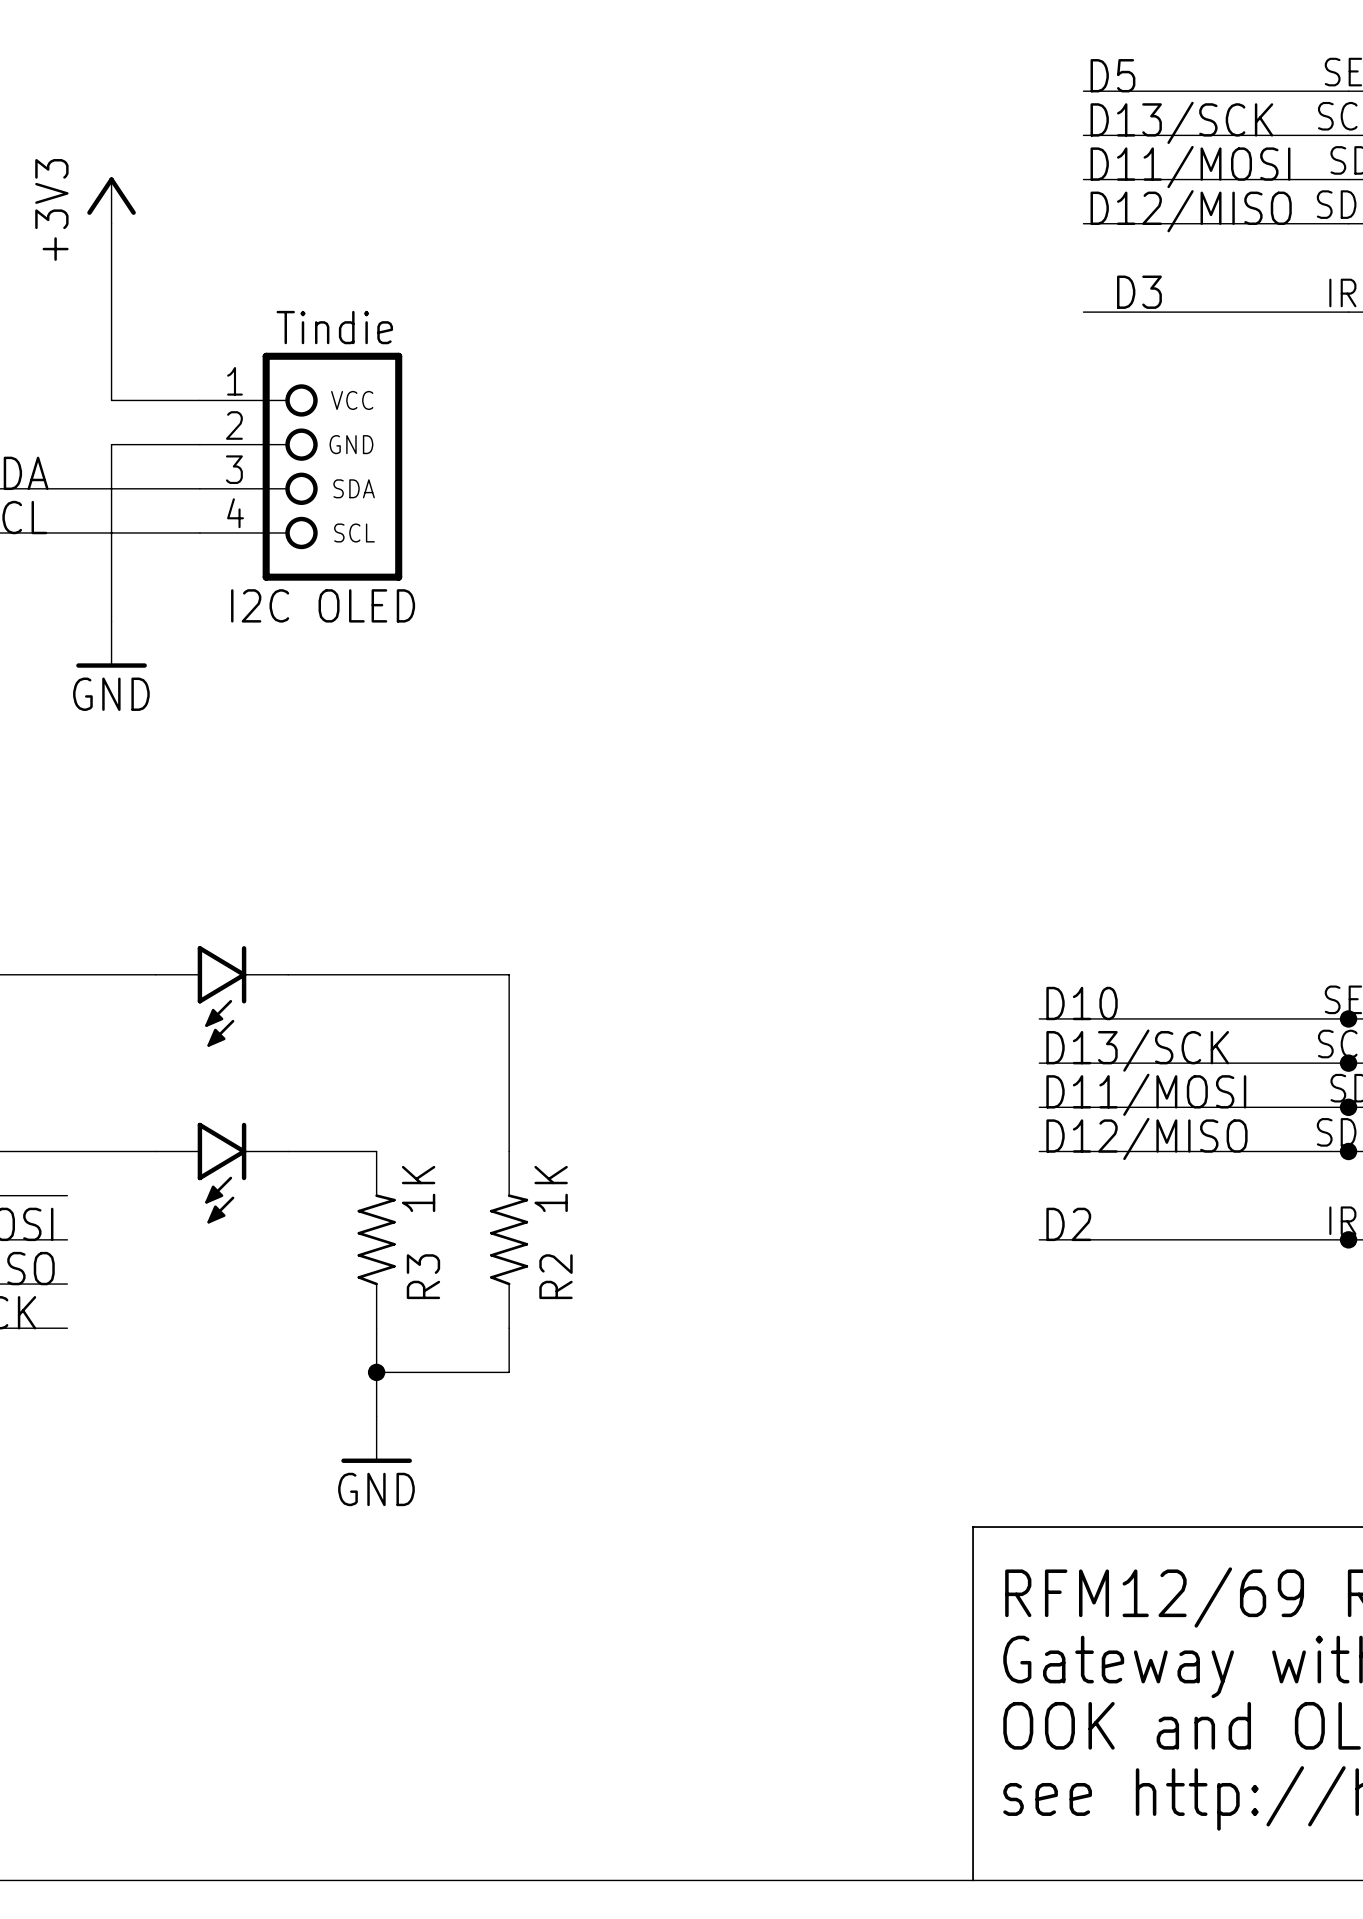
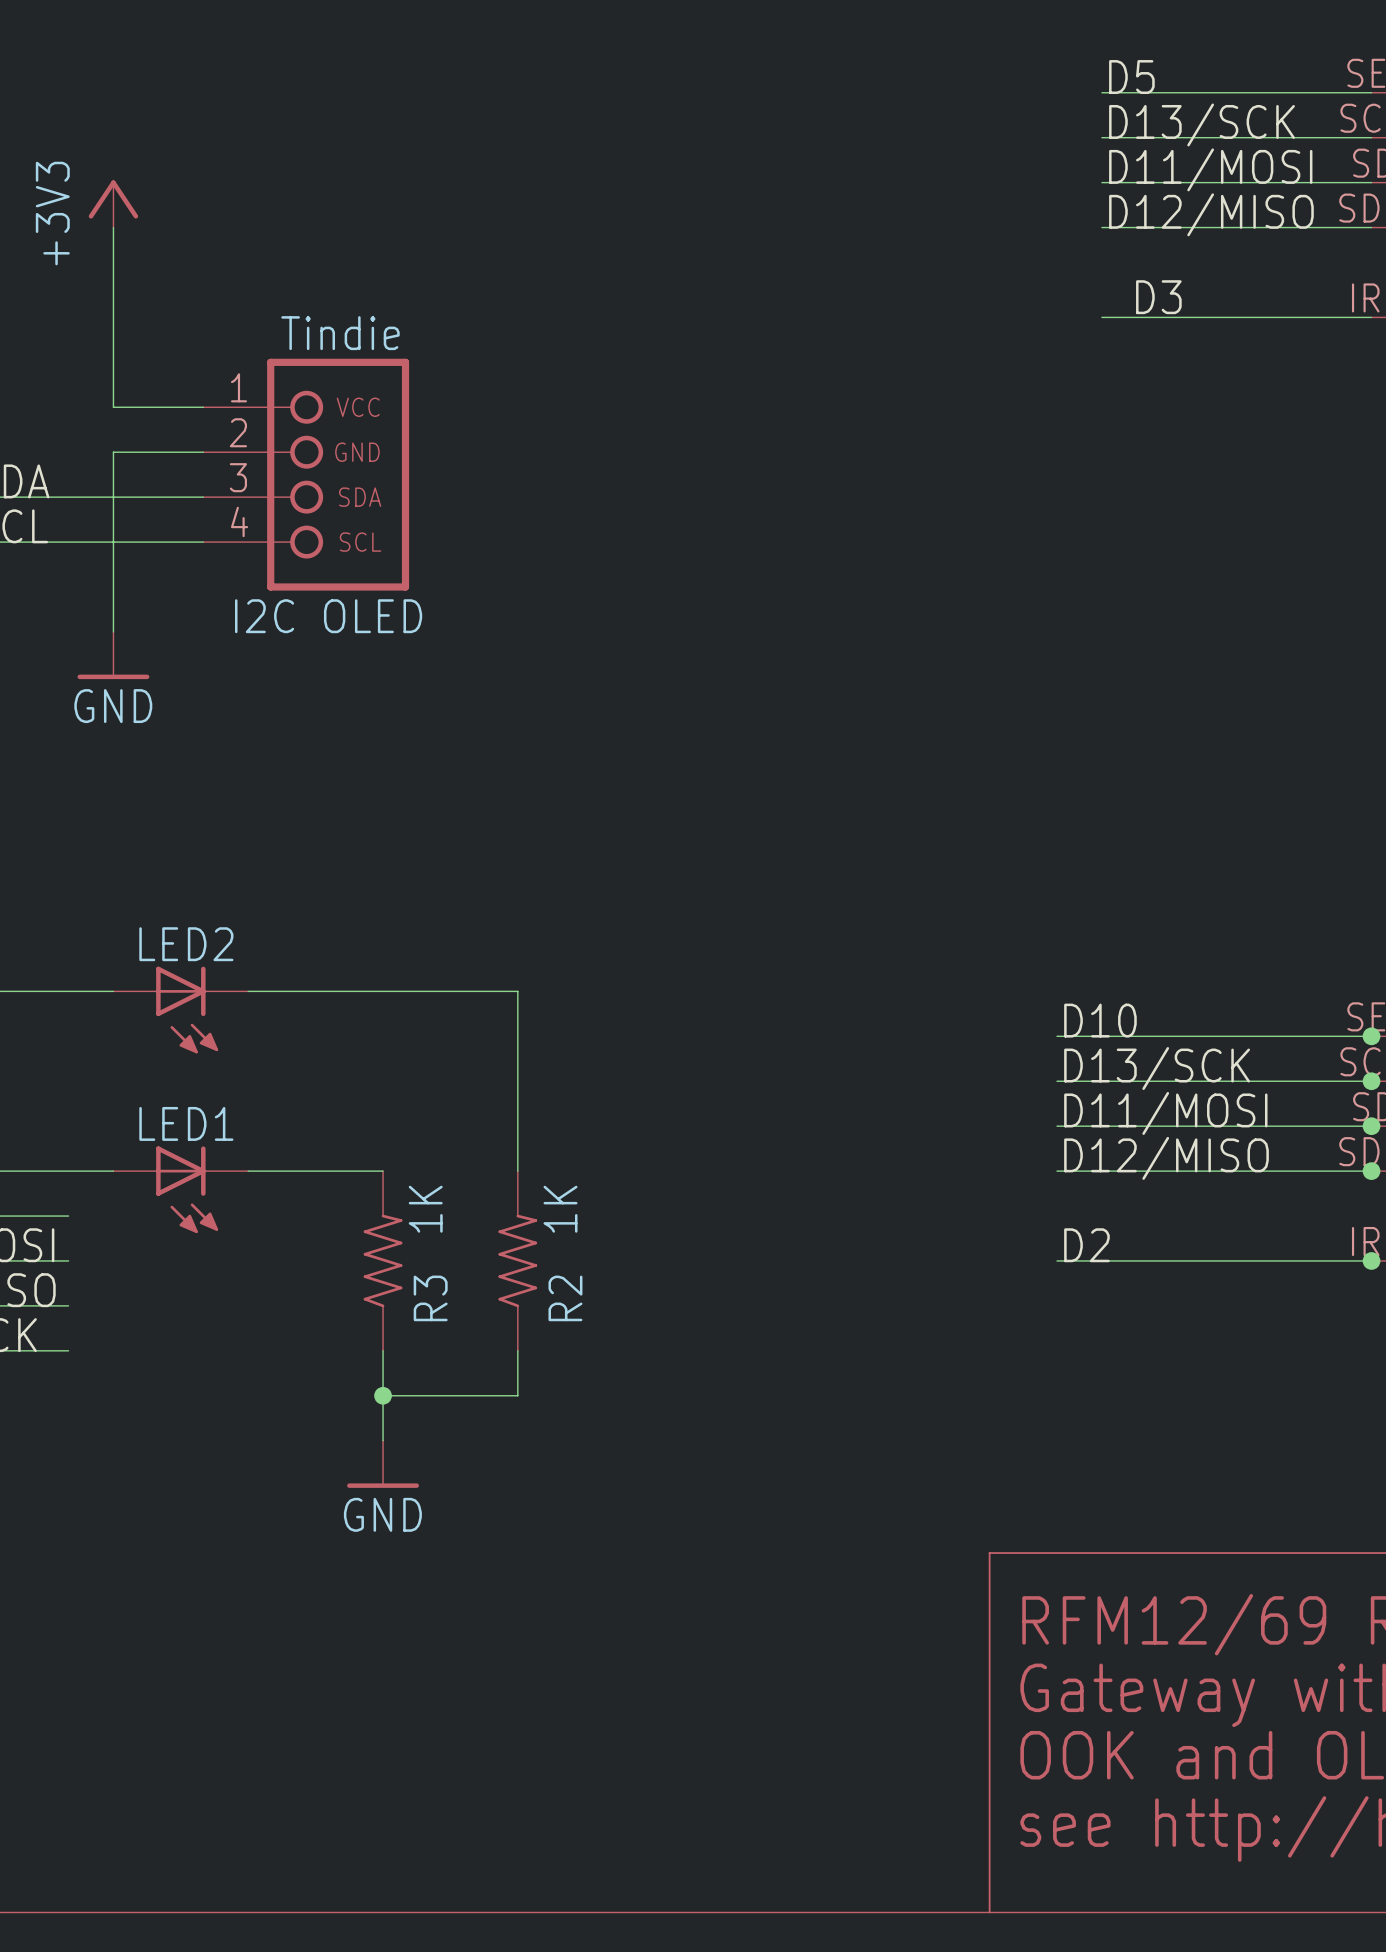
LED2: none -> (180, 1010)
part: (221, 996) -> none
LED1: none -> (180, 1189)
part: (221, 1173) -> none

